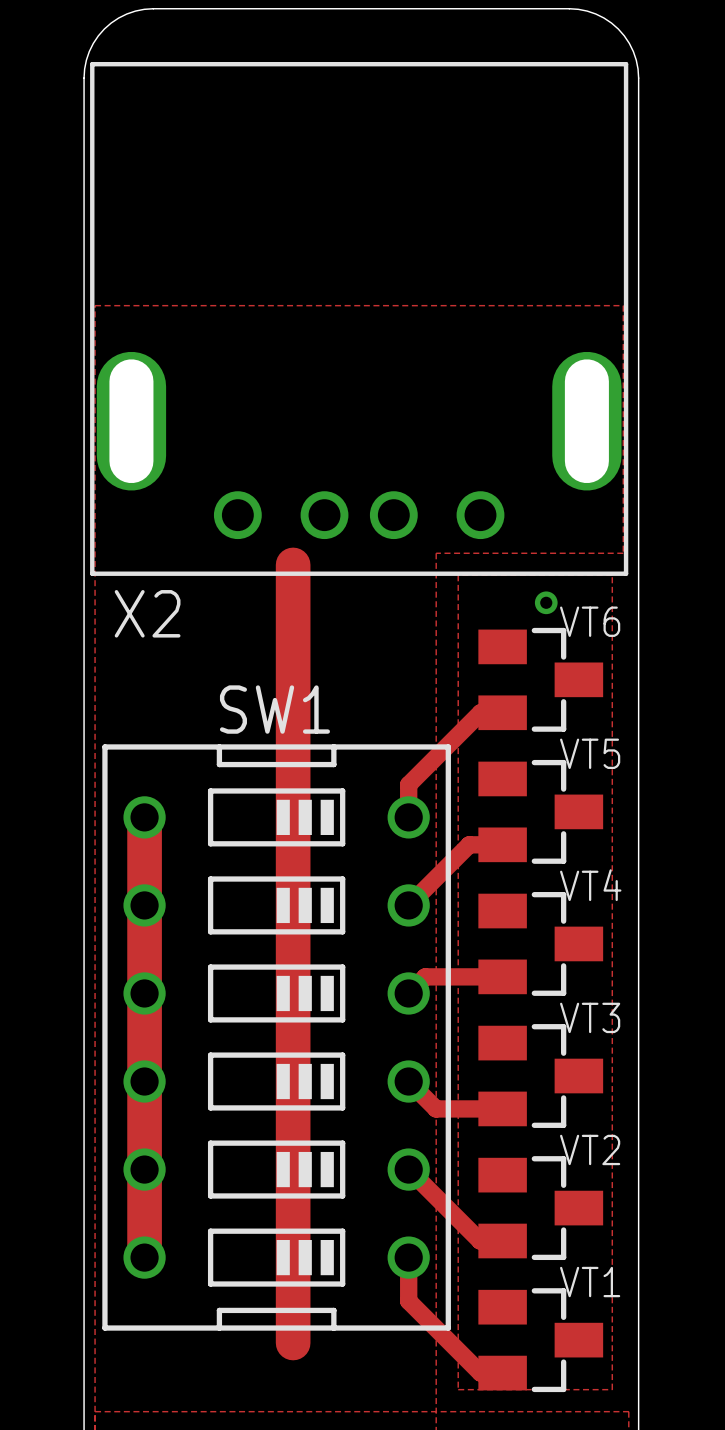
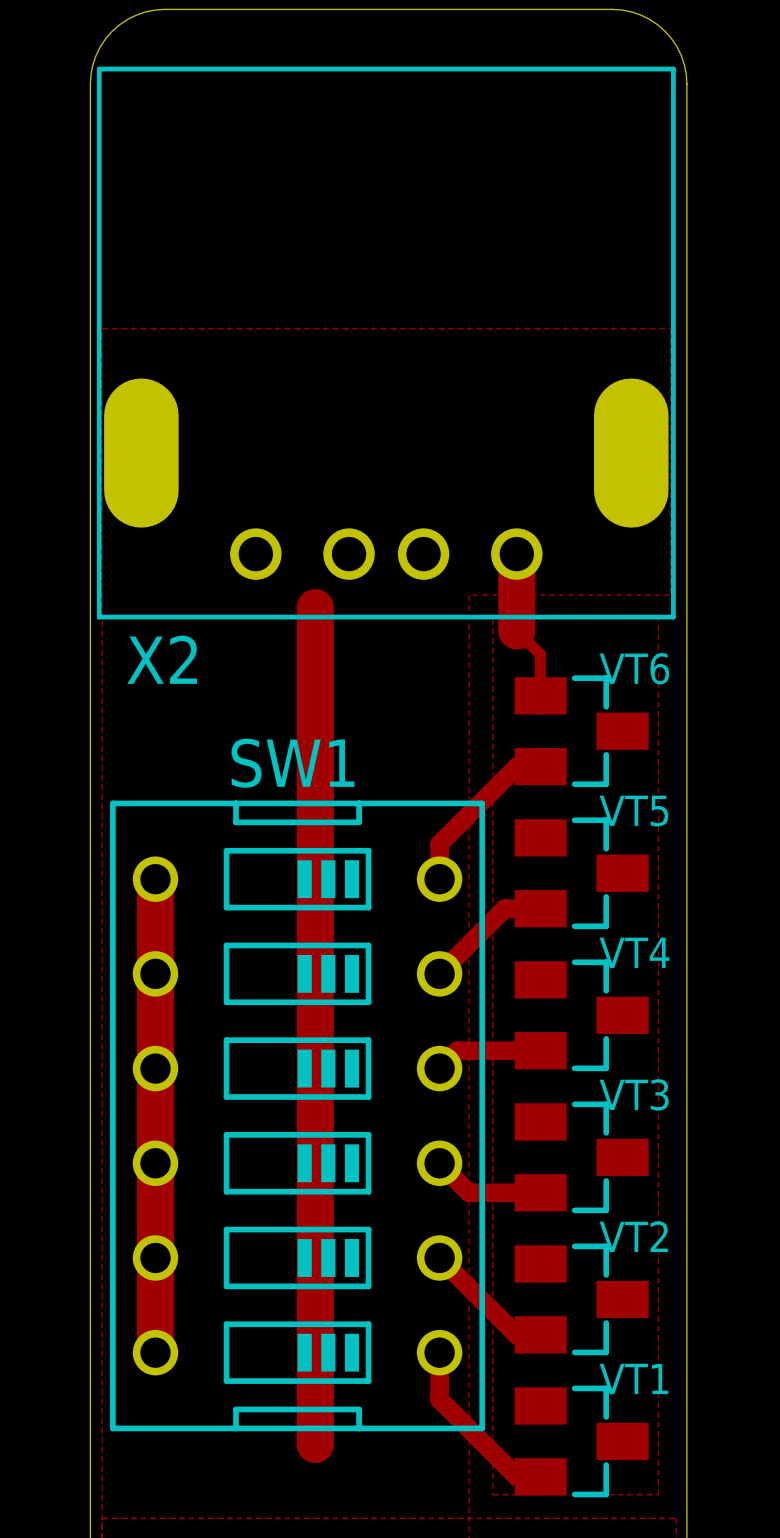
track: none -> (516, 554) (516, 630) (540, 654) (540, 695)
via: (546, 602) -> none

